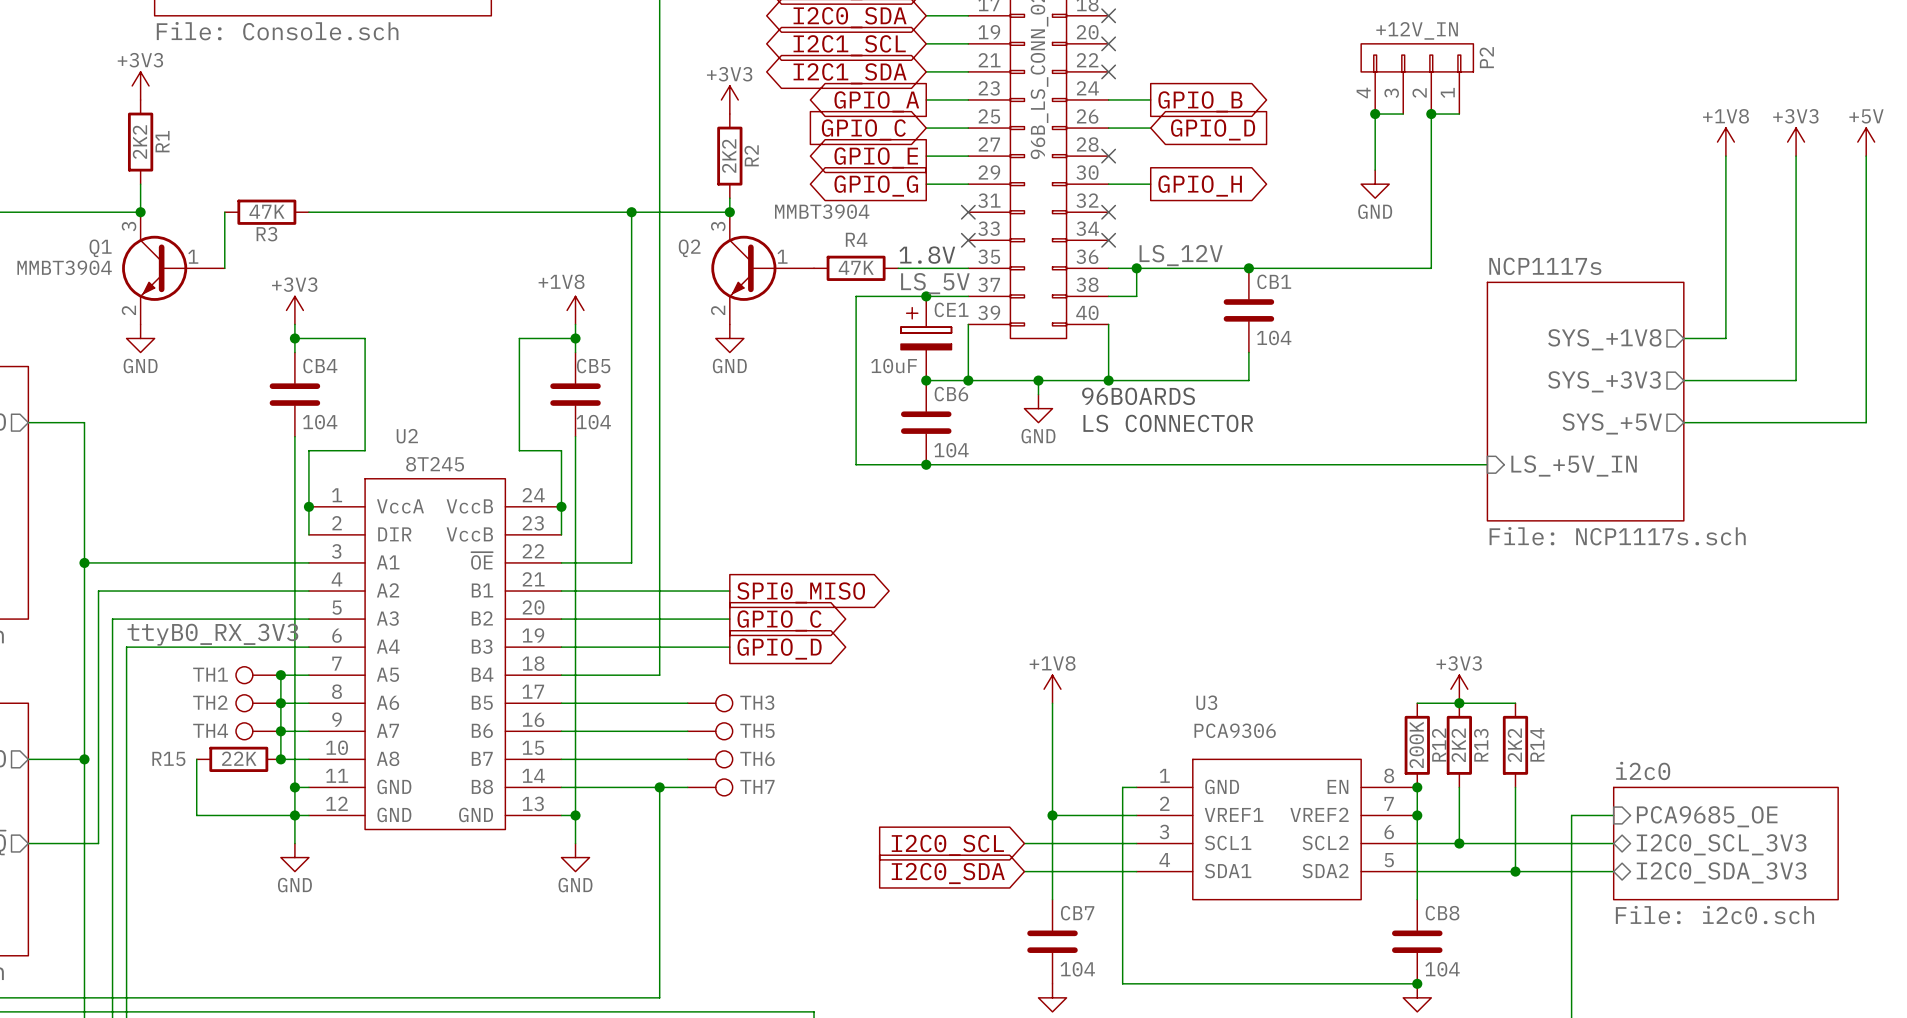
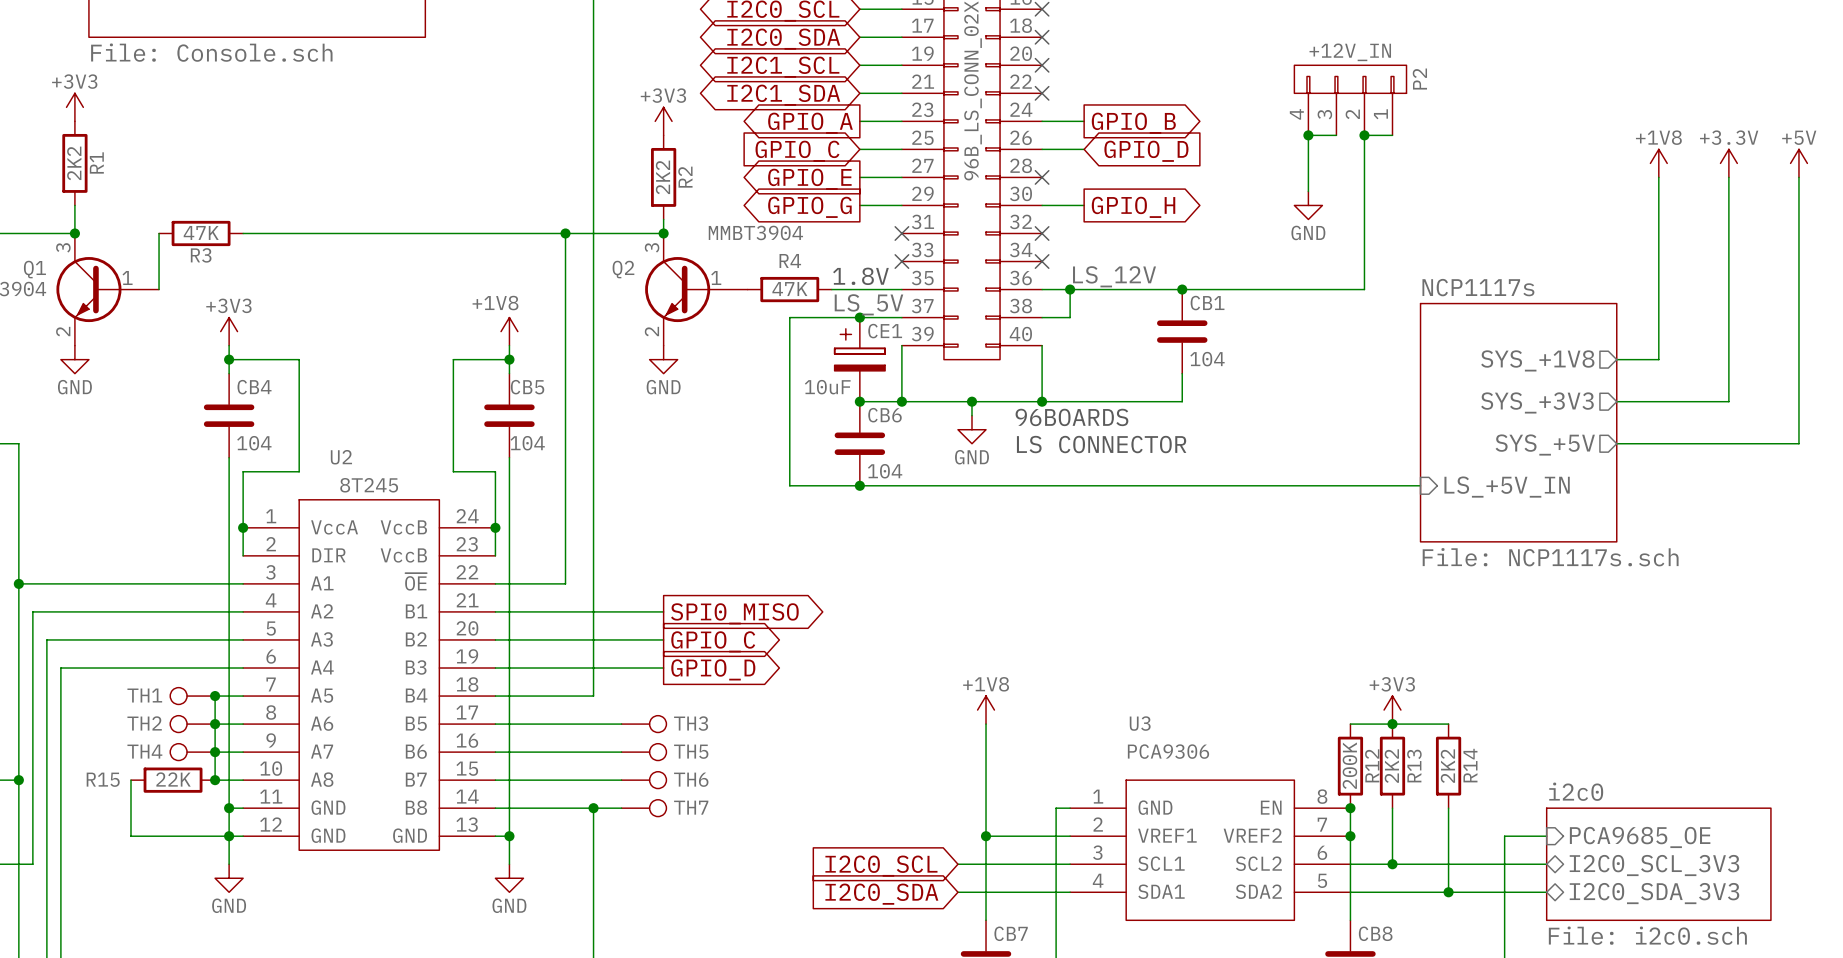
power symbol: +3V3 (1796, 142) -> +3.3V (1728, 163)
label: ttyB0_RX_3V3 (212, 634) -> none

